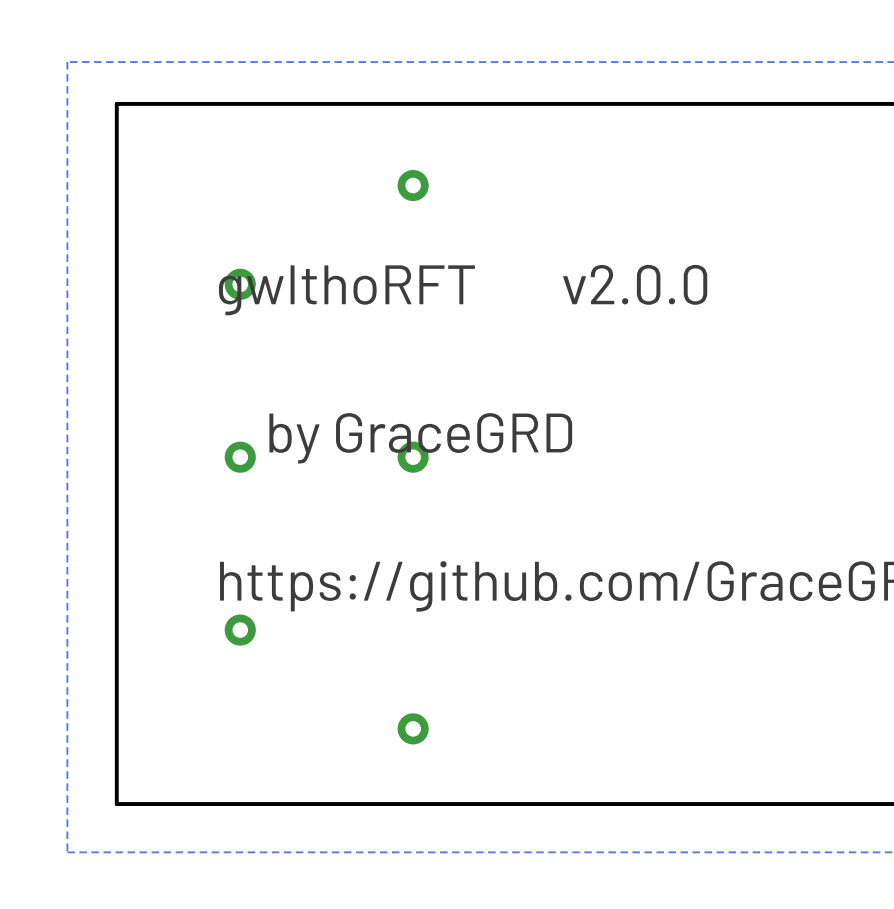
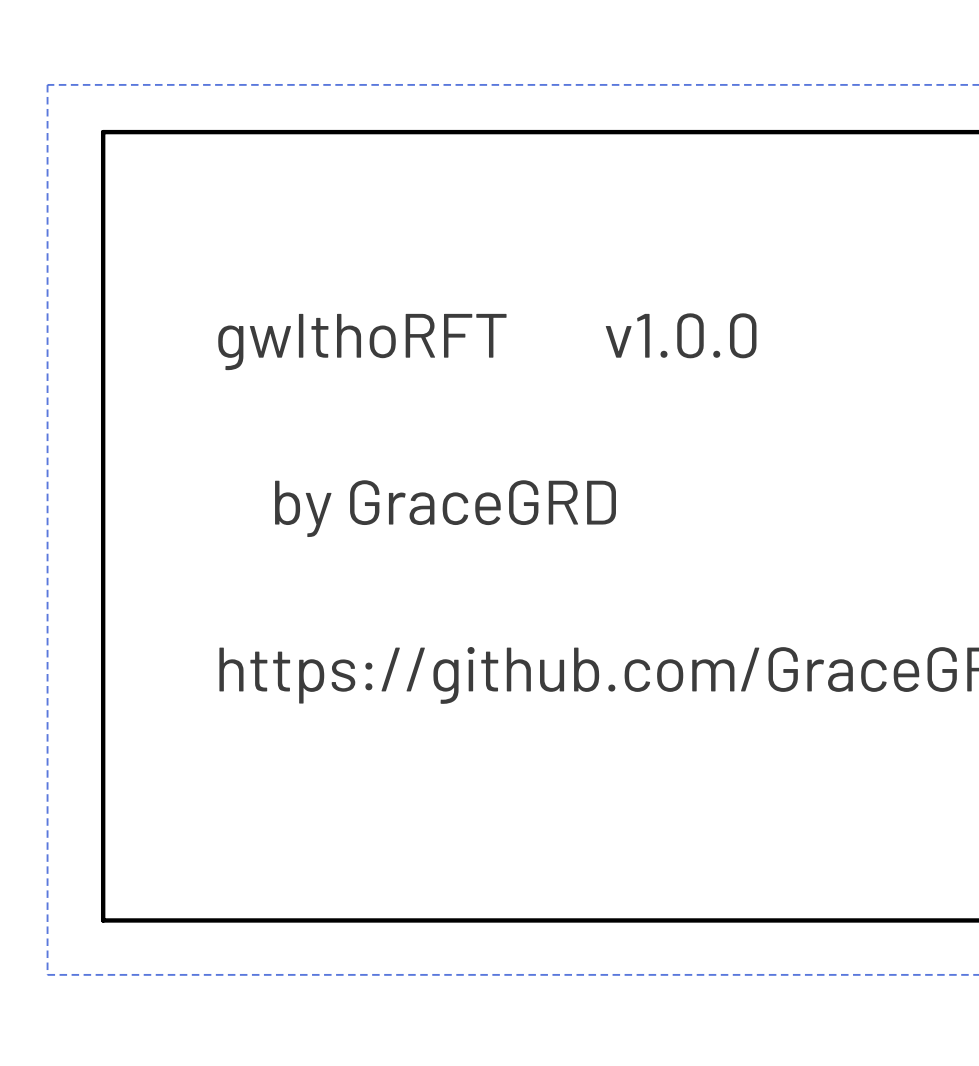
via: (413, 185) -> none
via: (240, 284) -> none
text: v2.0.0 (635, 284) -> v1.0.0 (681, 335)
via: (240, 457) -> none
via: (413, 457) -> none
via: (240, 630) -> none
via: (413, 728) -> none

